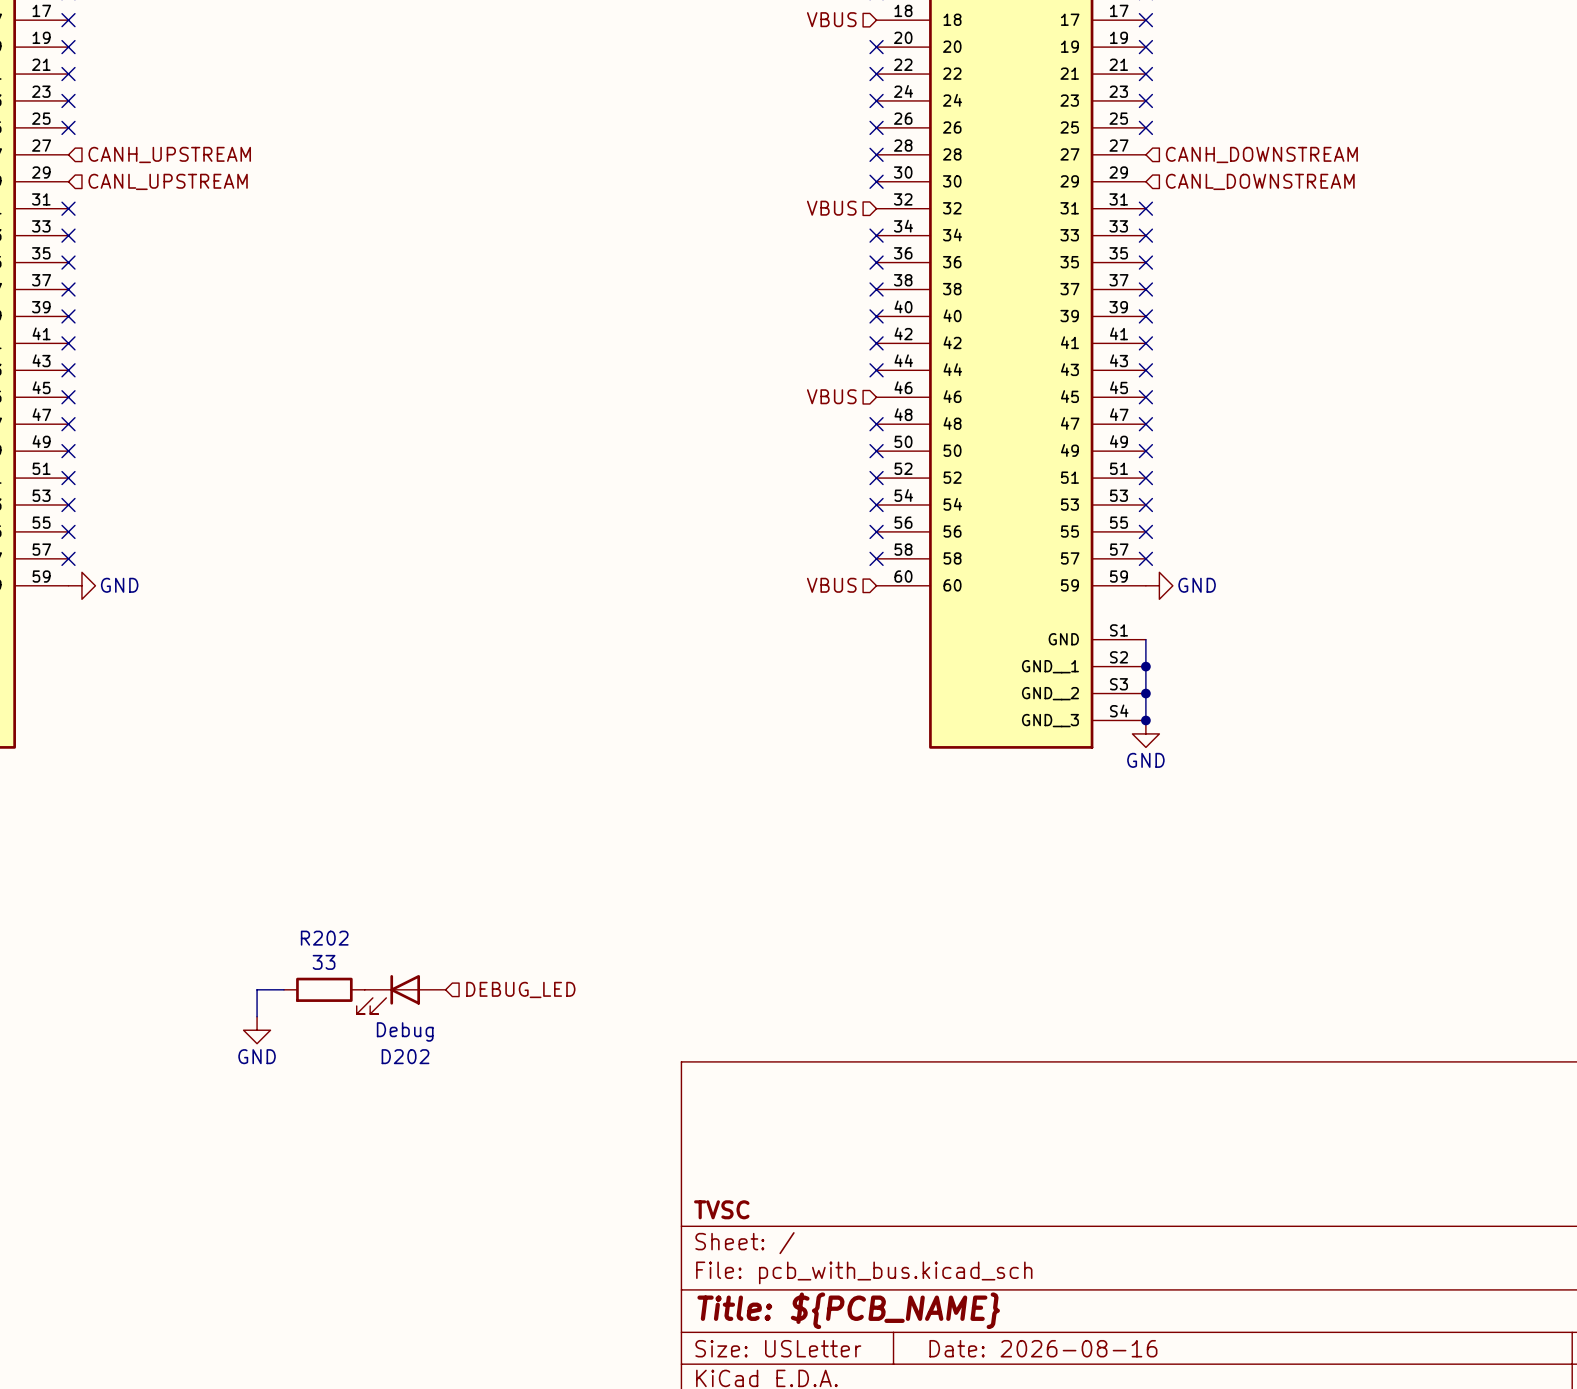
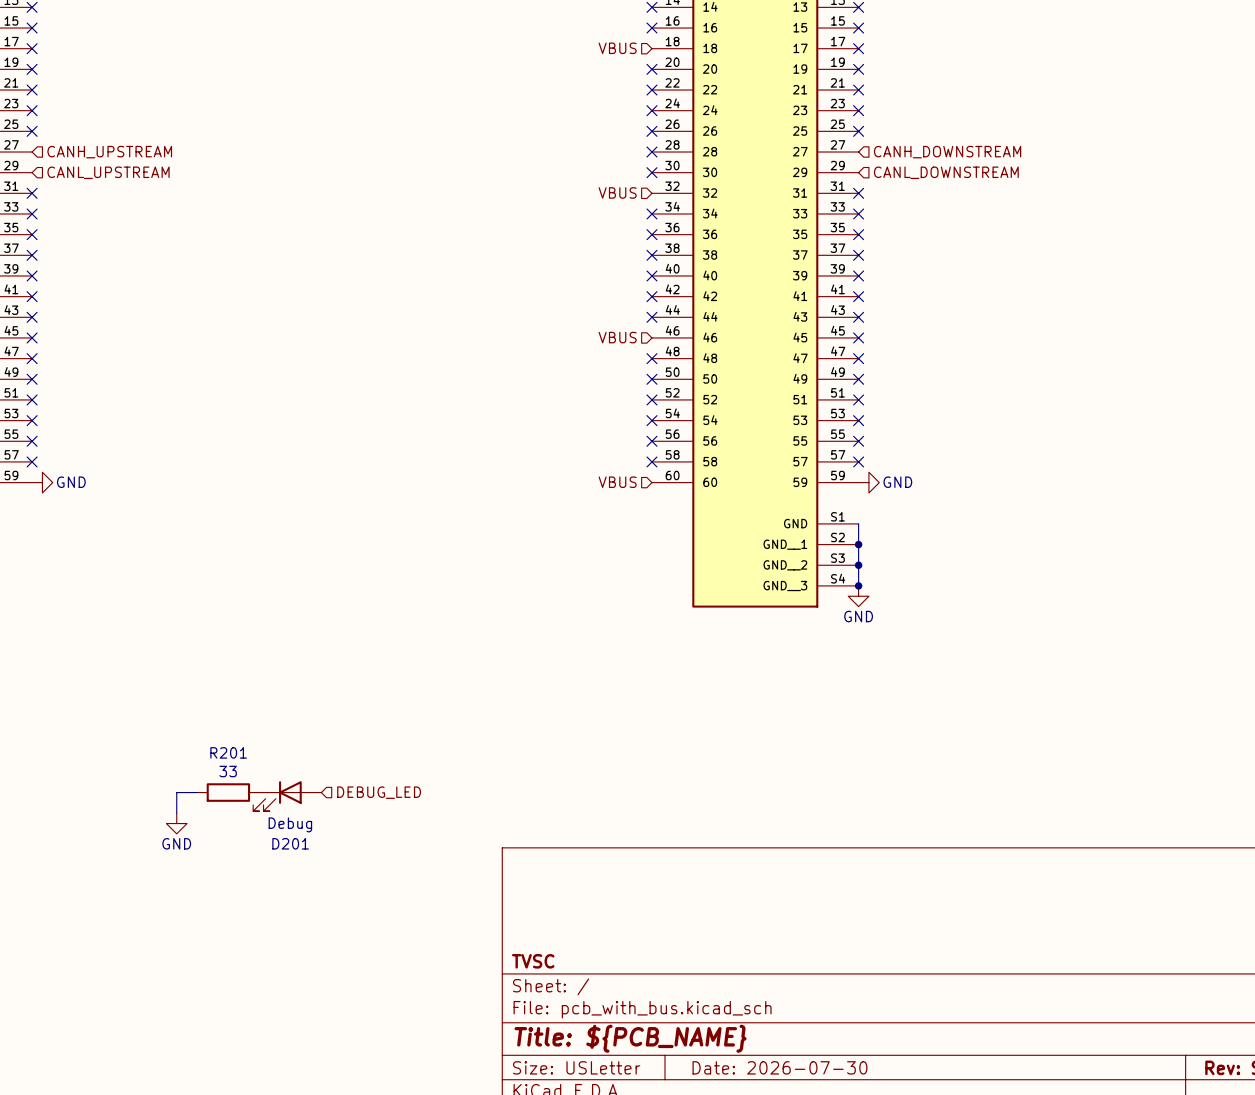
R202 name: R202 (324, 938) -> R201 (228, 752)
D202 name: D202 (405, 1056) -> D201 (290, 843)
title block: Date: 2026-08-16 (1043, 1348) -> Date: 2026-07-30 (779, 1067)

